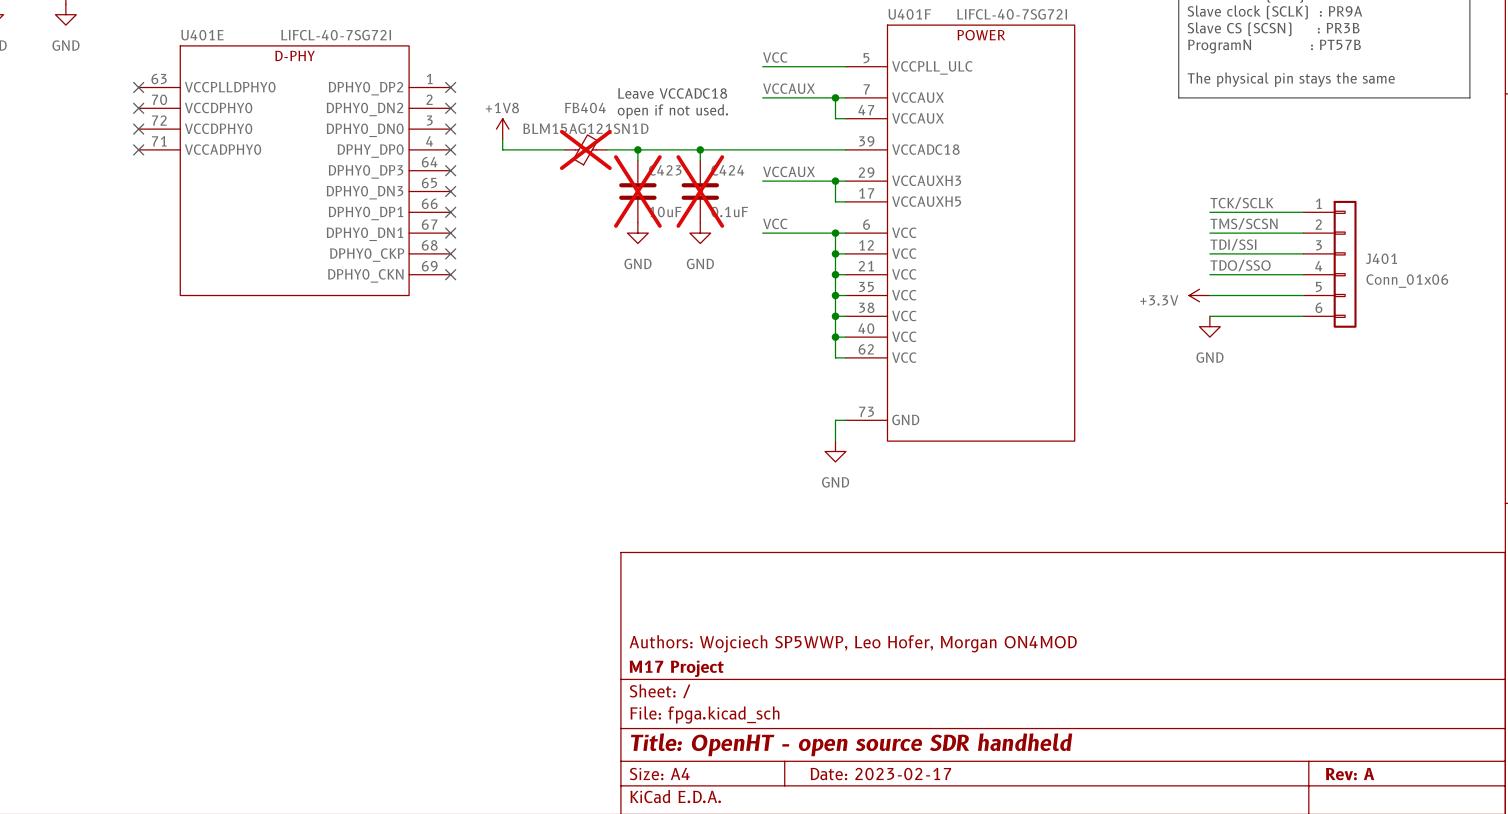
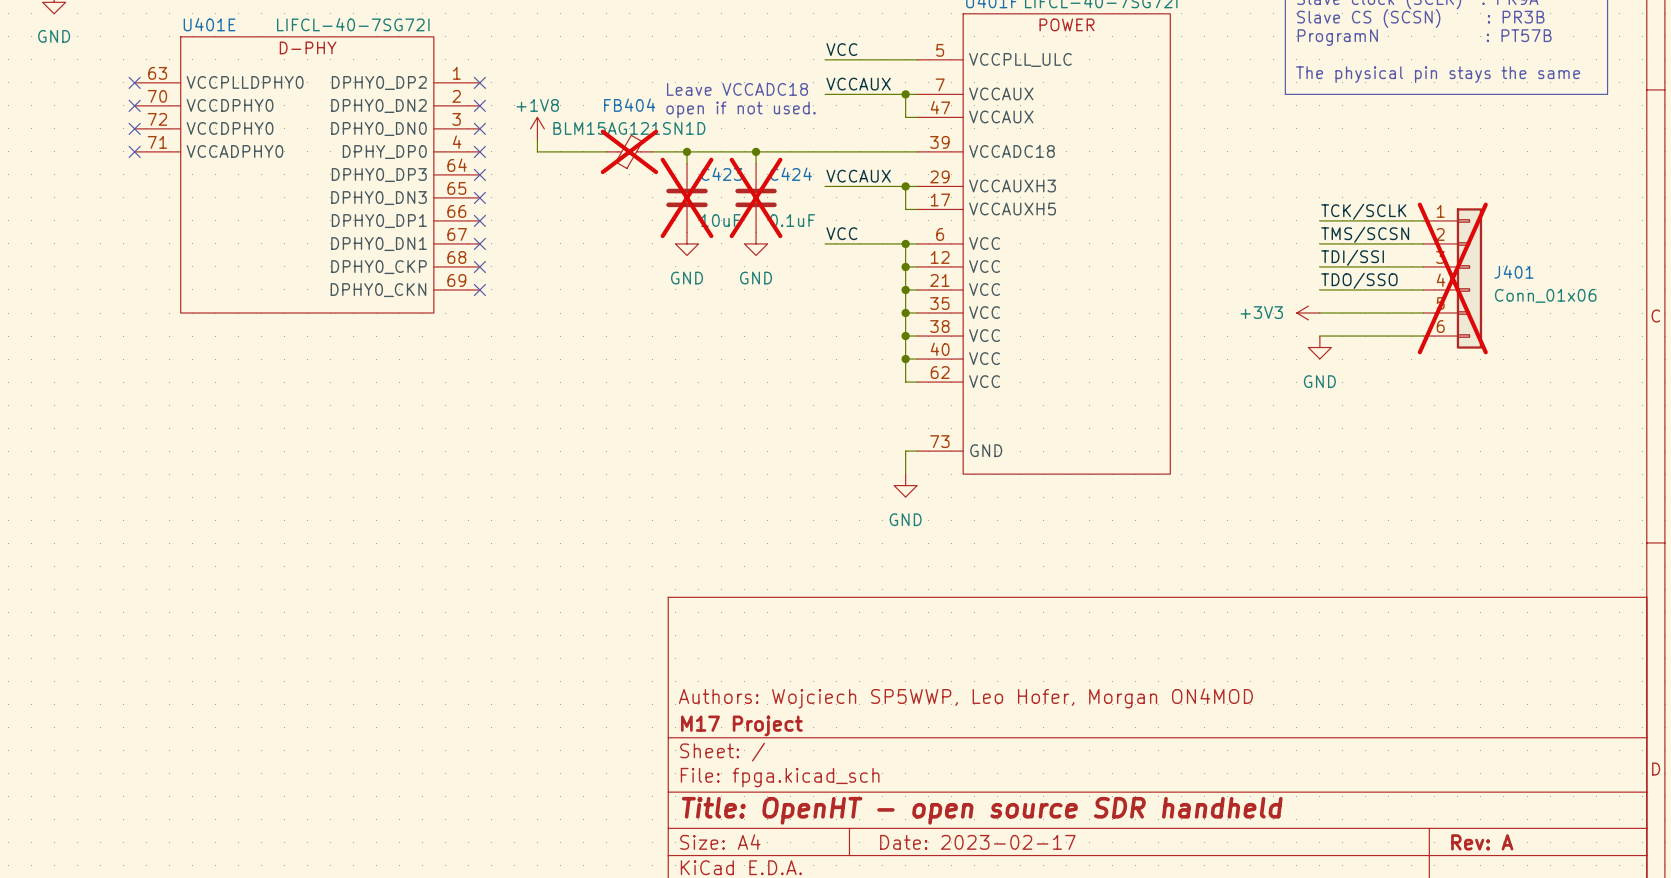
J401 do-not-place cross: none -> (1452, 278)
power symbol: +3.3V (1199, 295) -> +3V3 (1308, 313)

